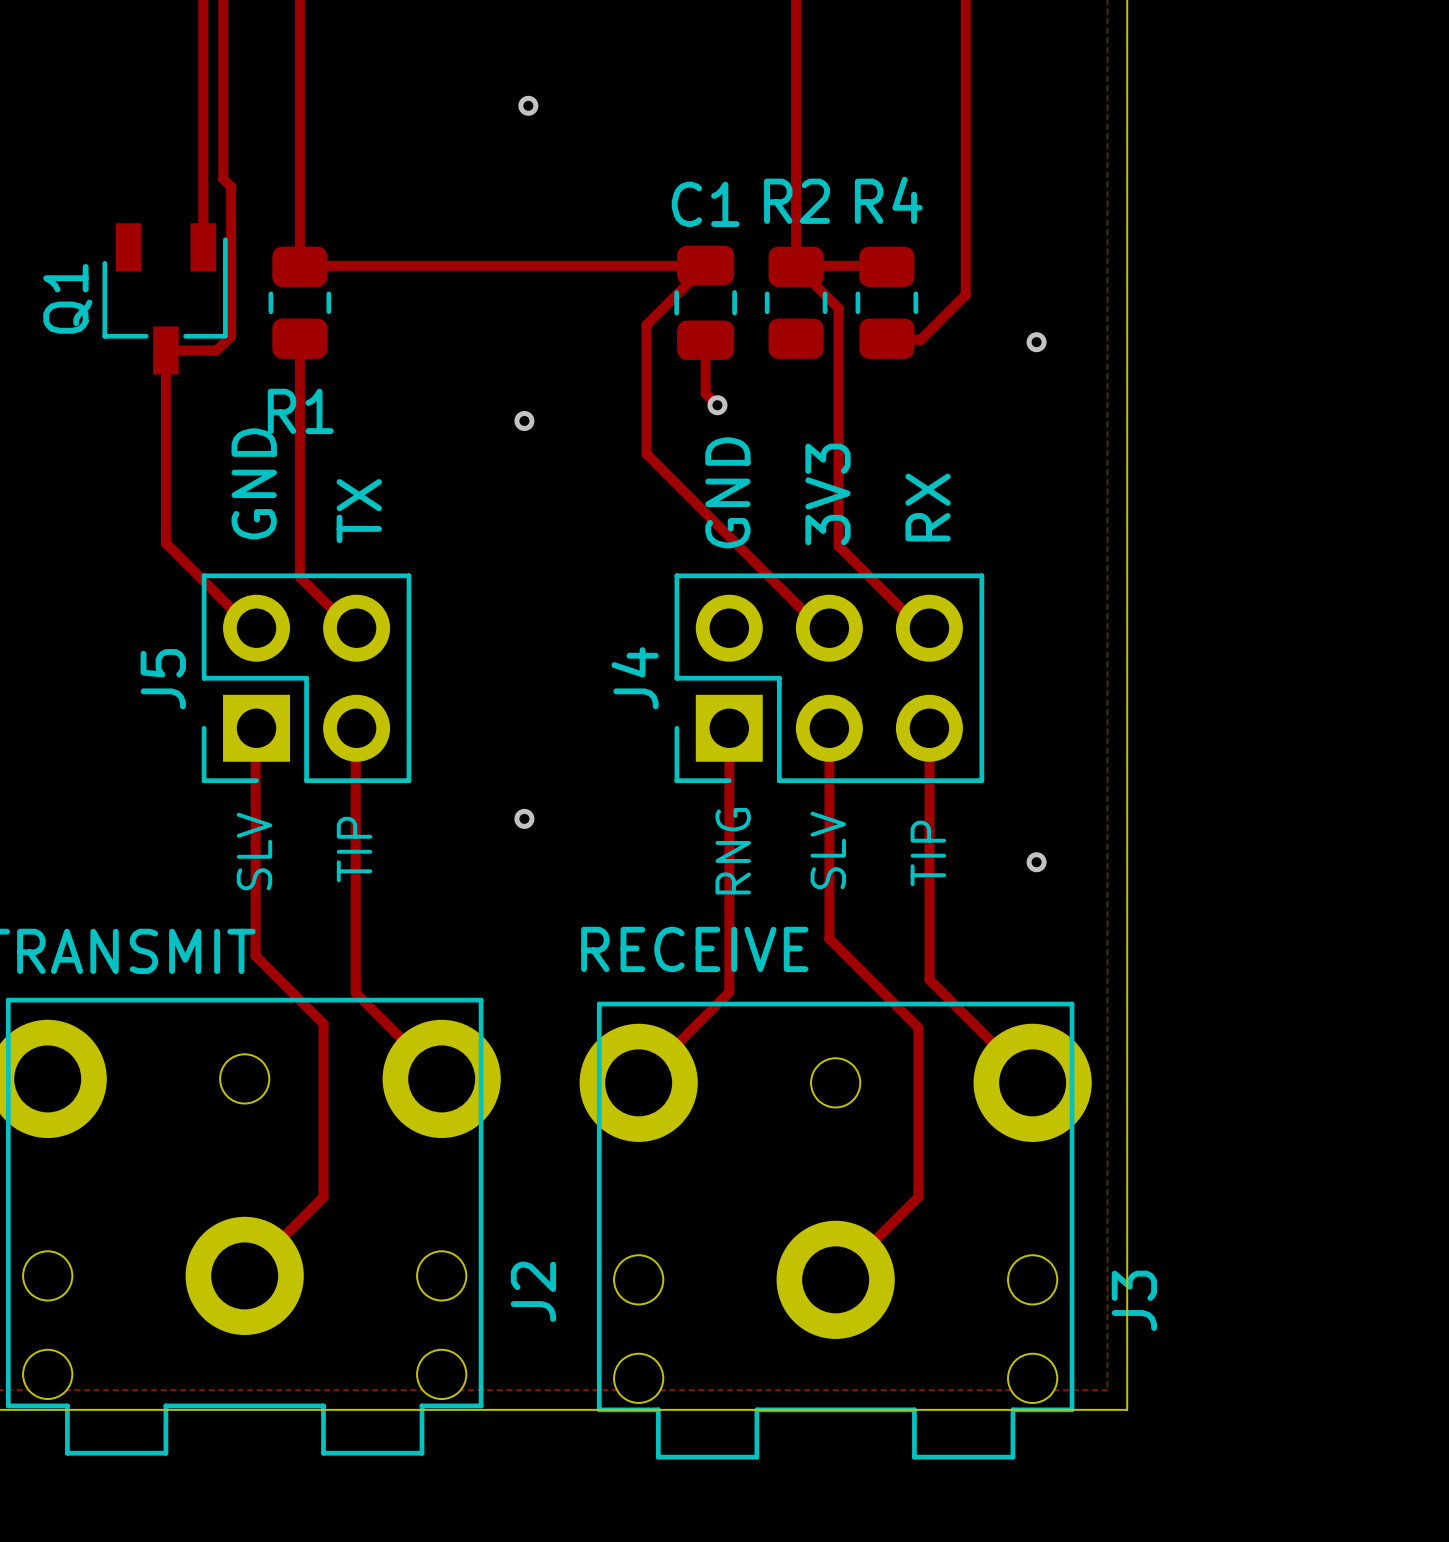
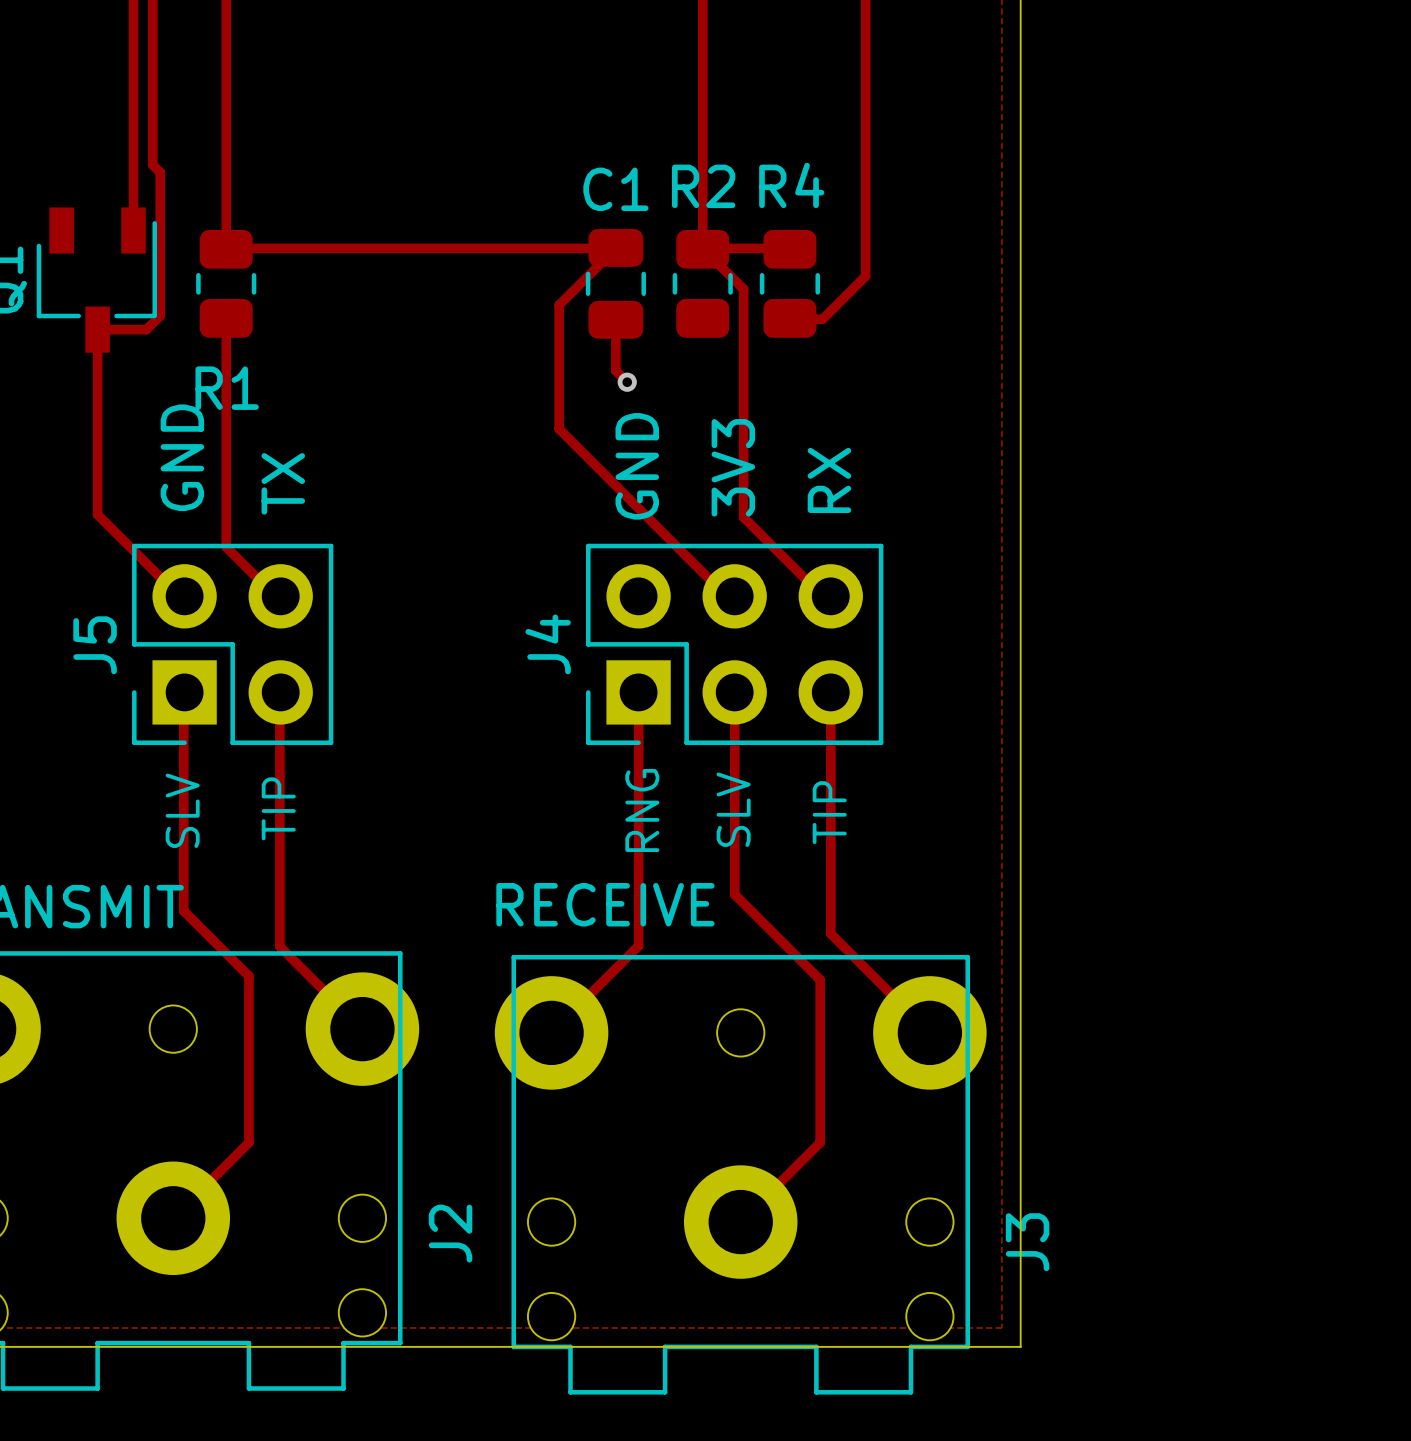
via: (528, 105) -> none
via: (1036, 342) -> none
via: (524, 420) -> none
via: (524, 818) -> none
via: (1036, 862) -> none

